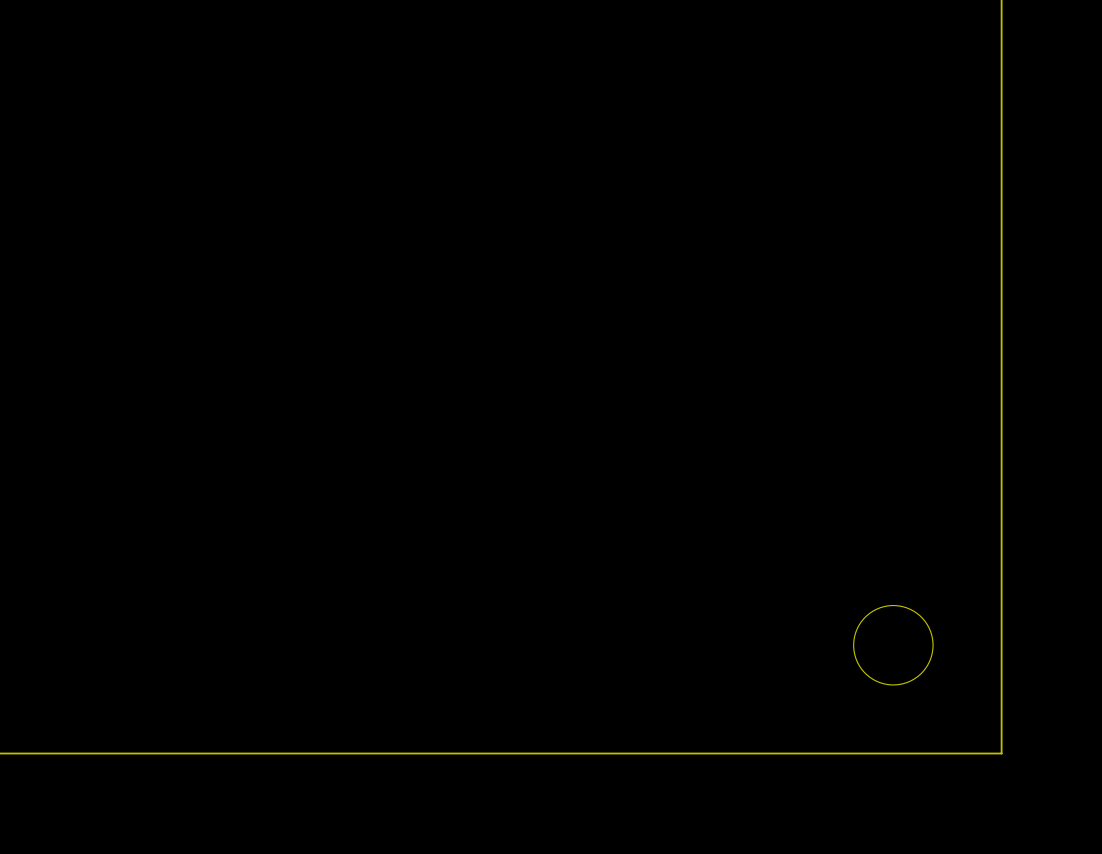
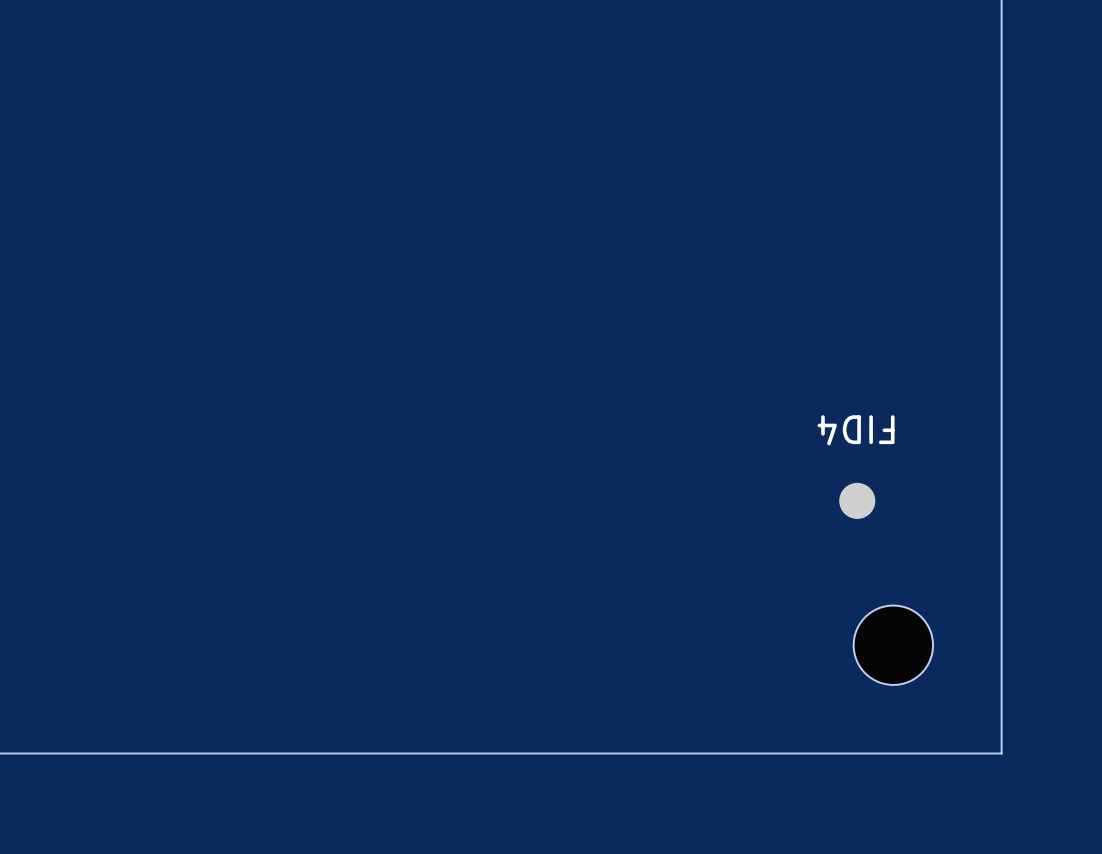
FID4: none -> (857, 500)

